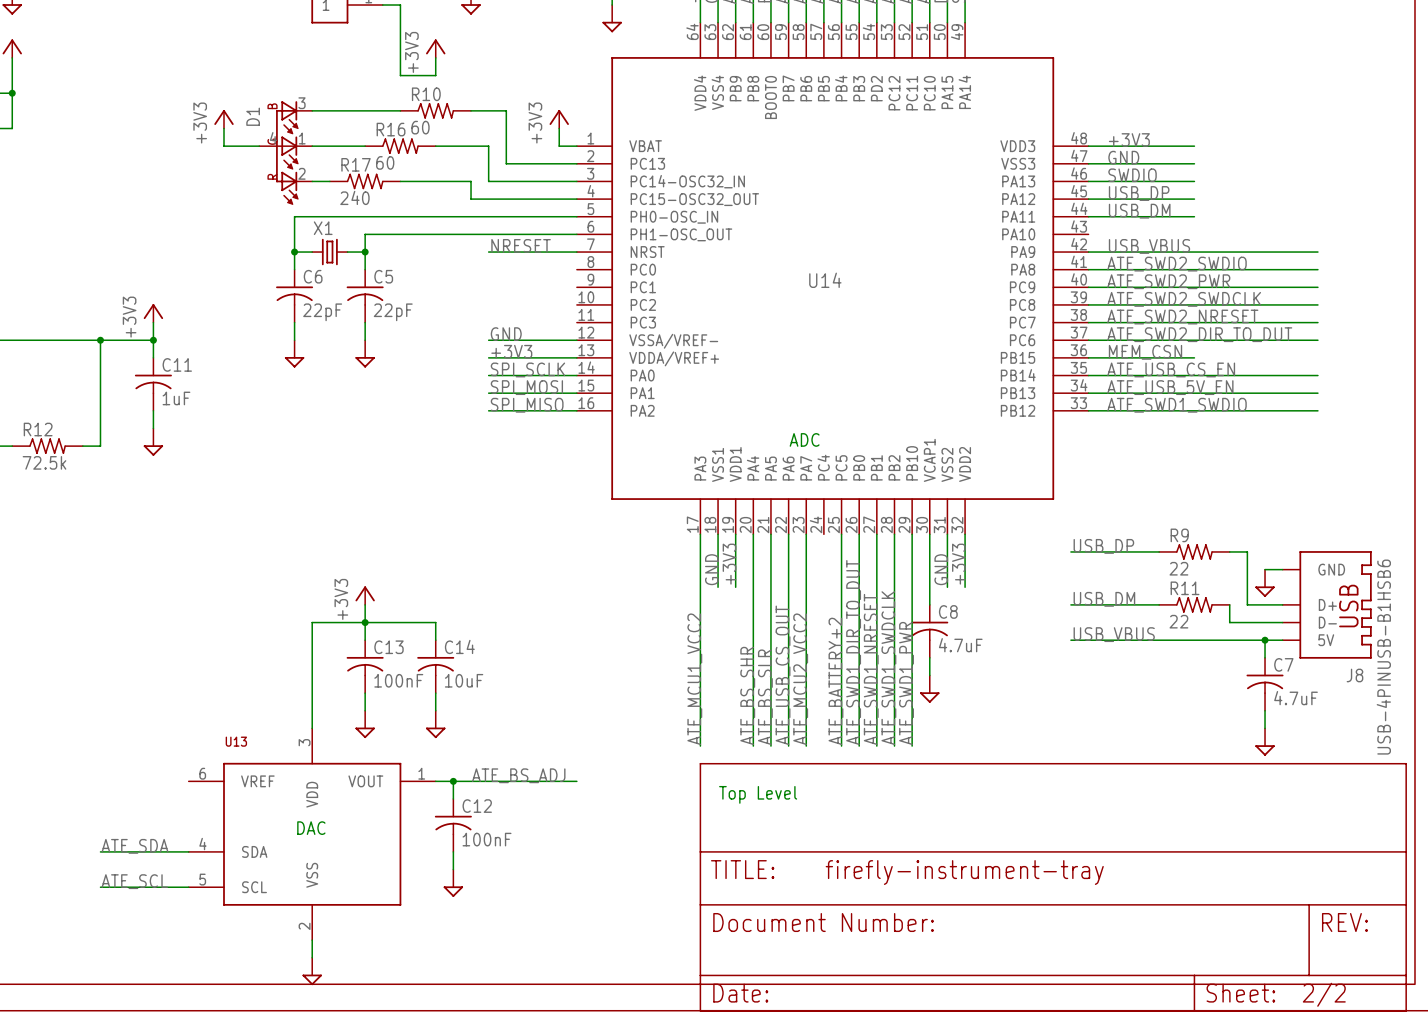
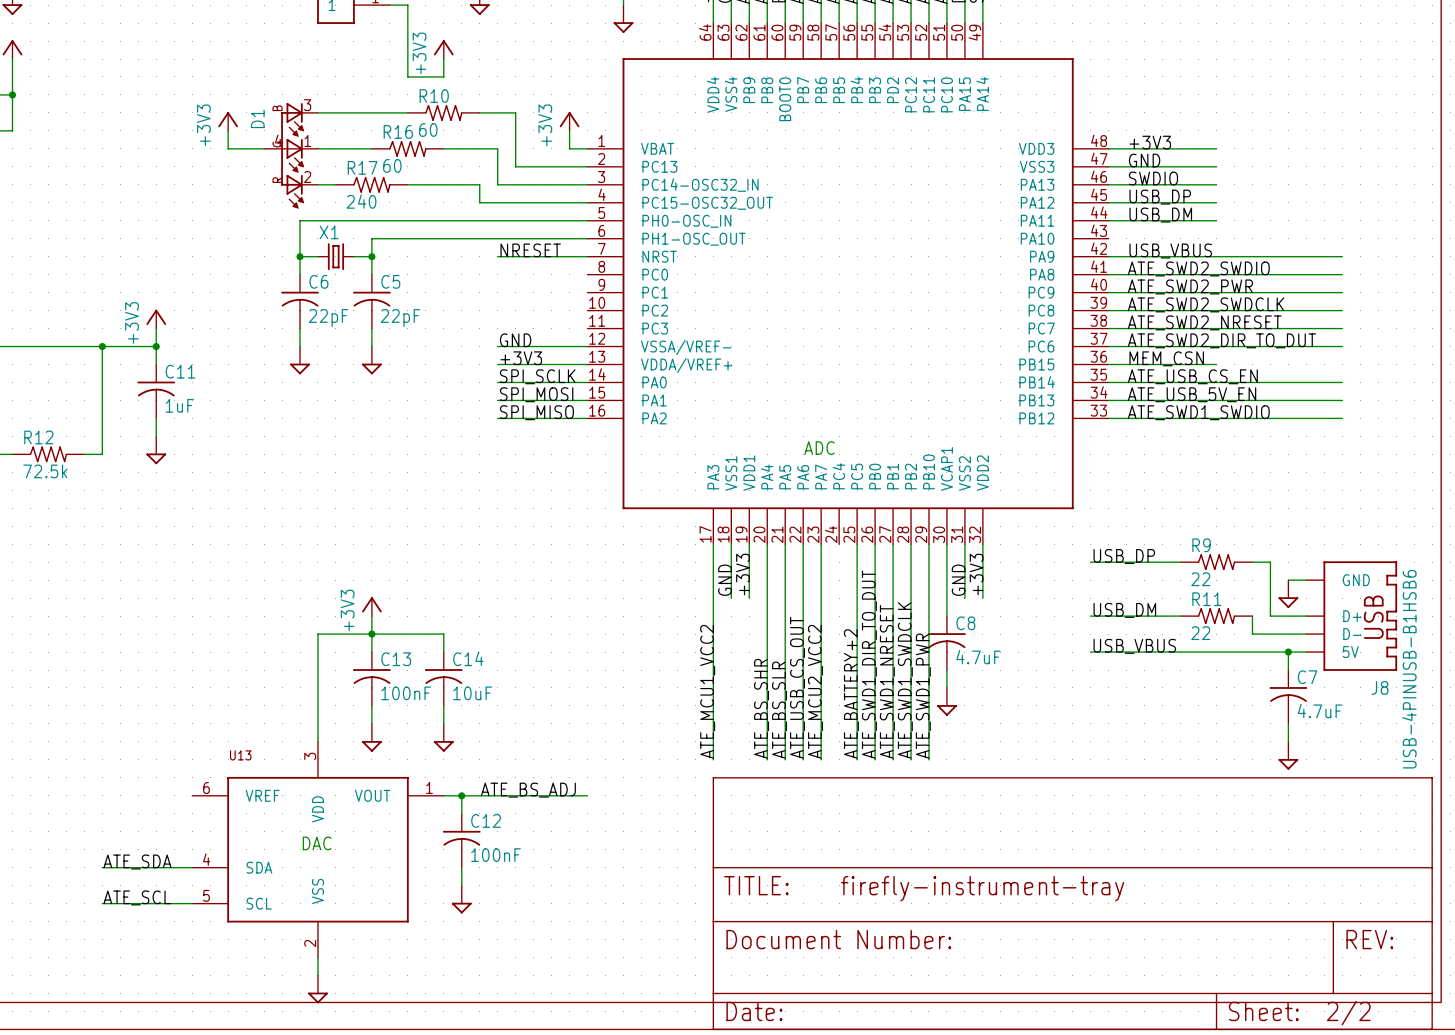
U14 name: U14 (825, 280) -> none
text: Top Level (758, 794) -> none

